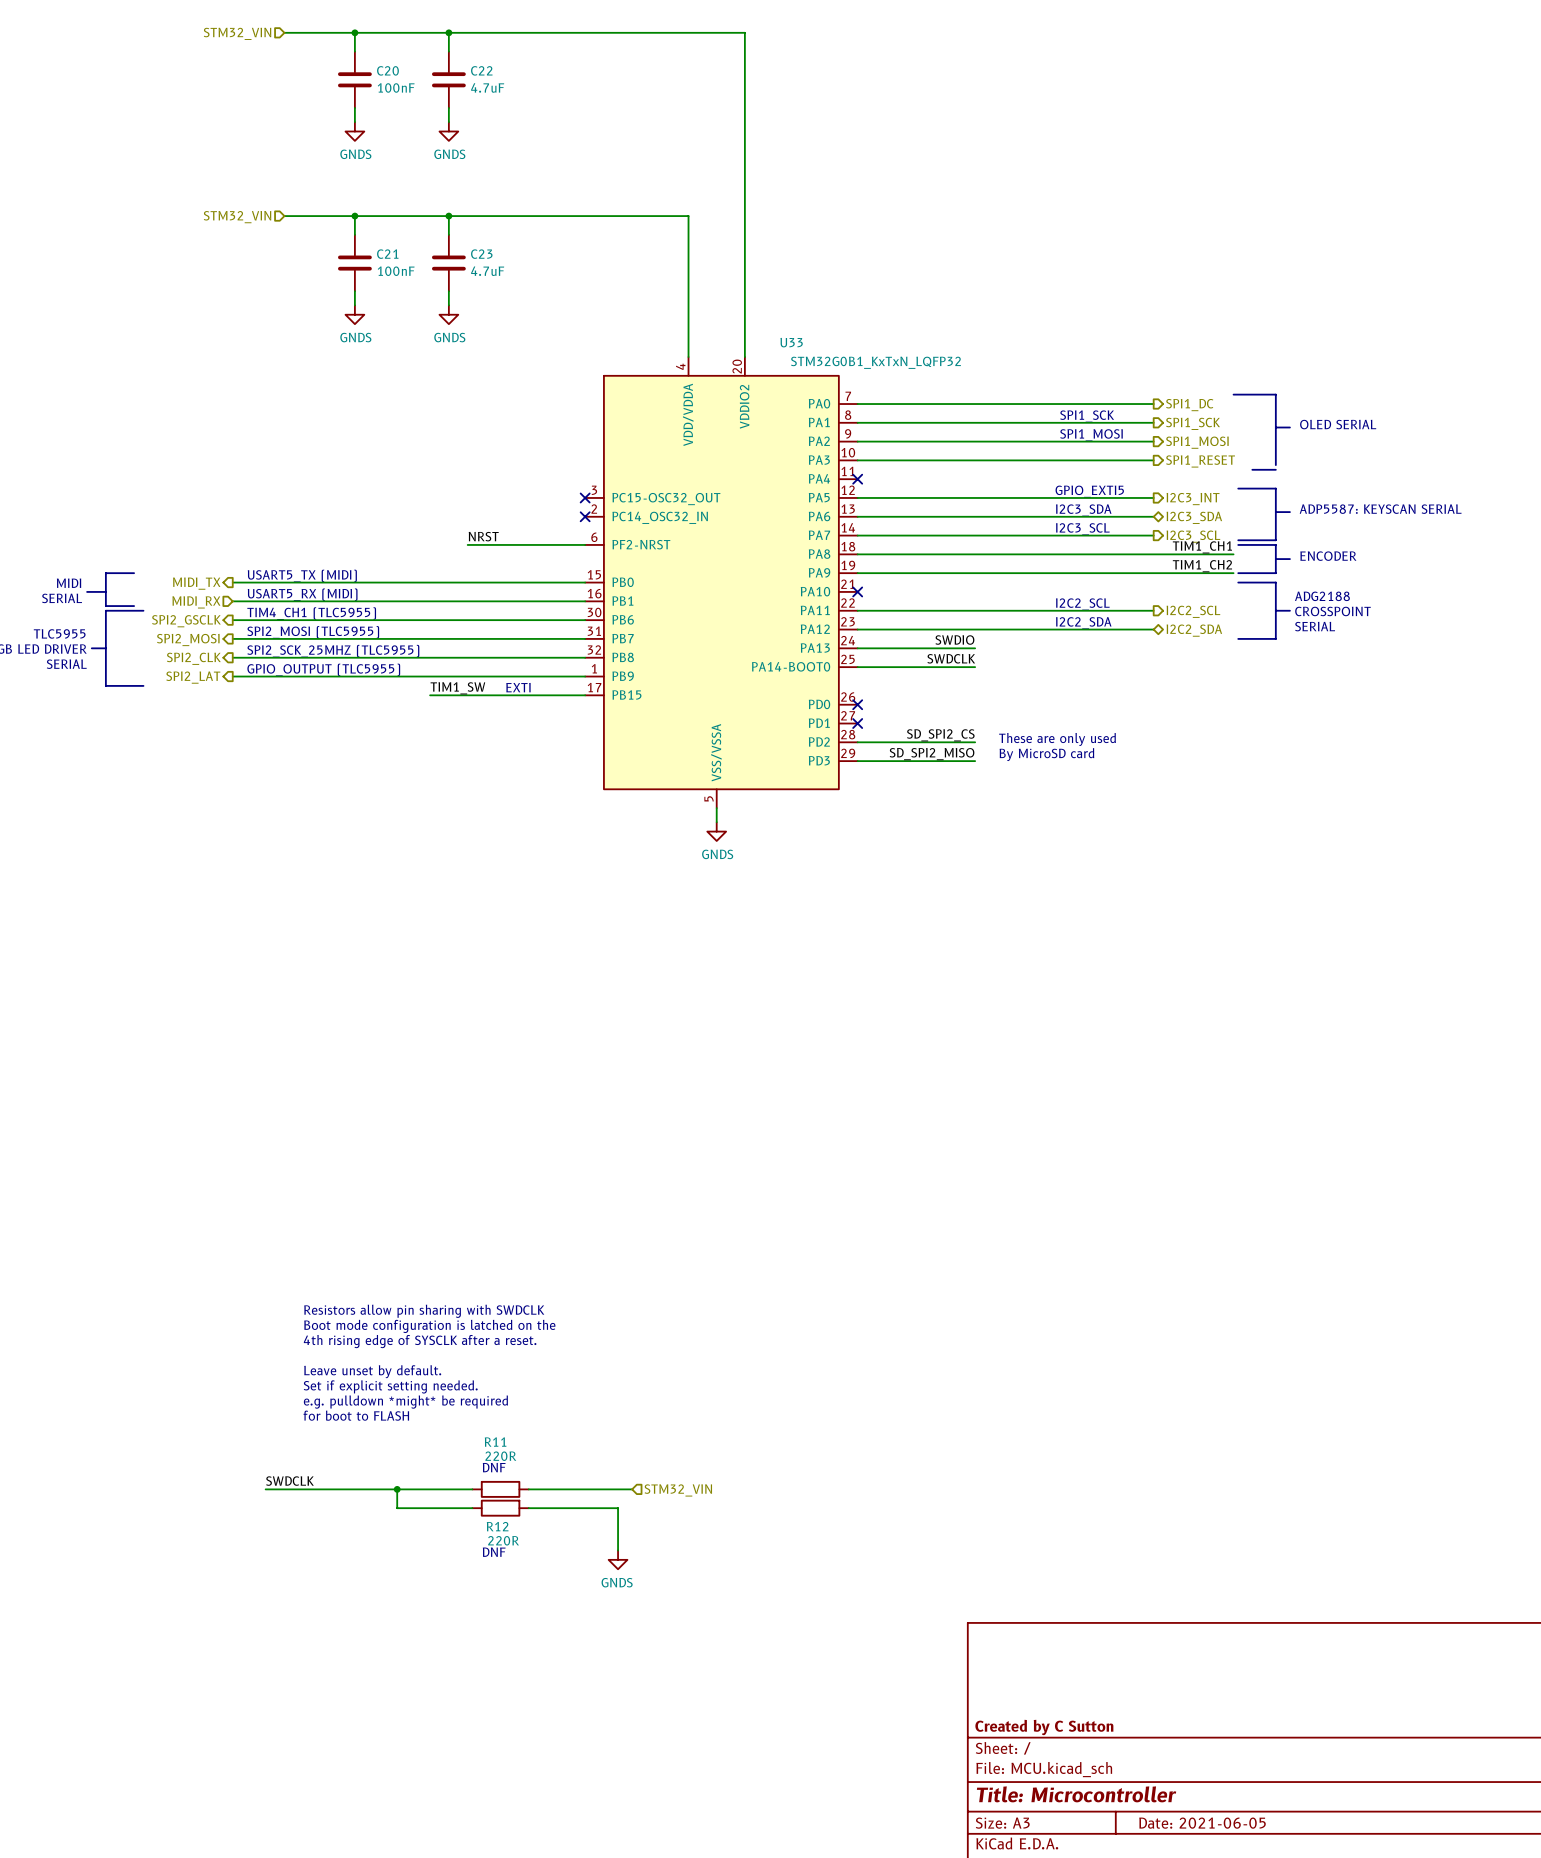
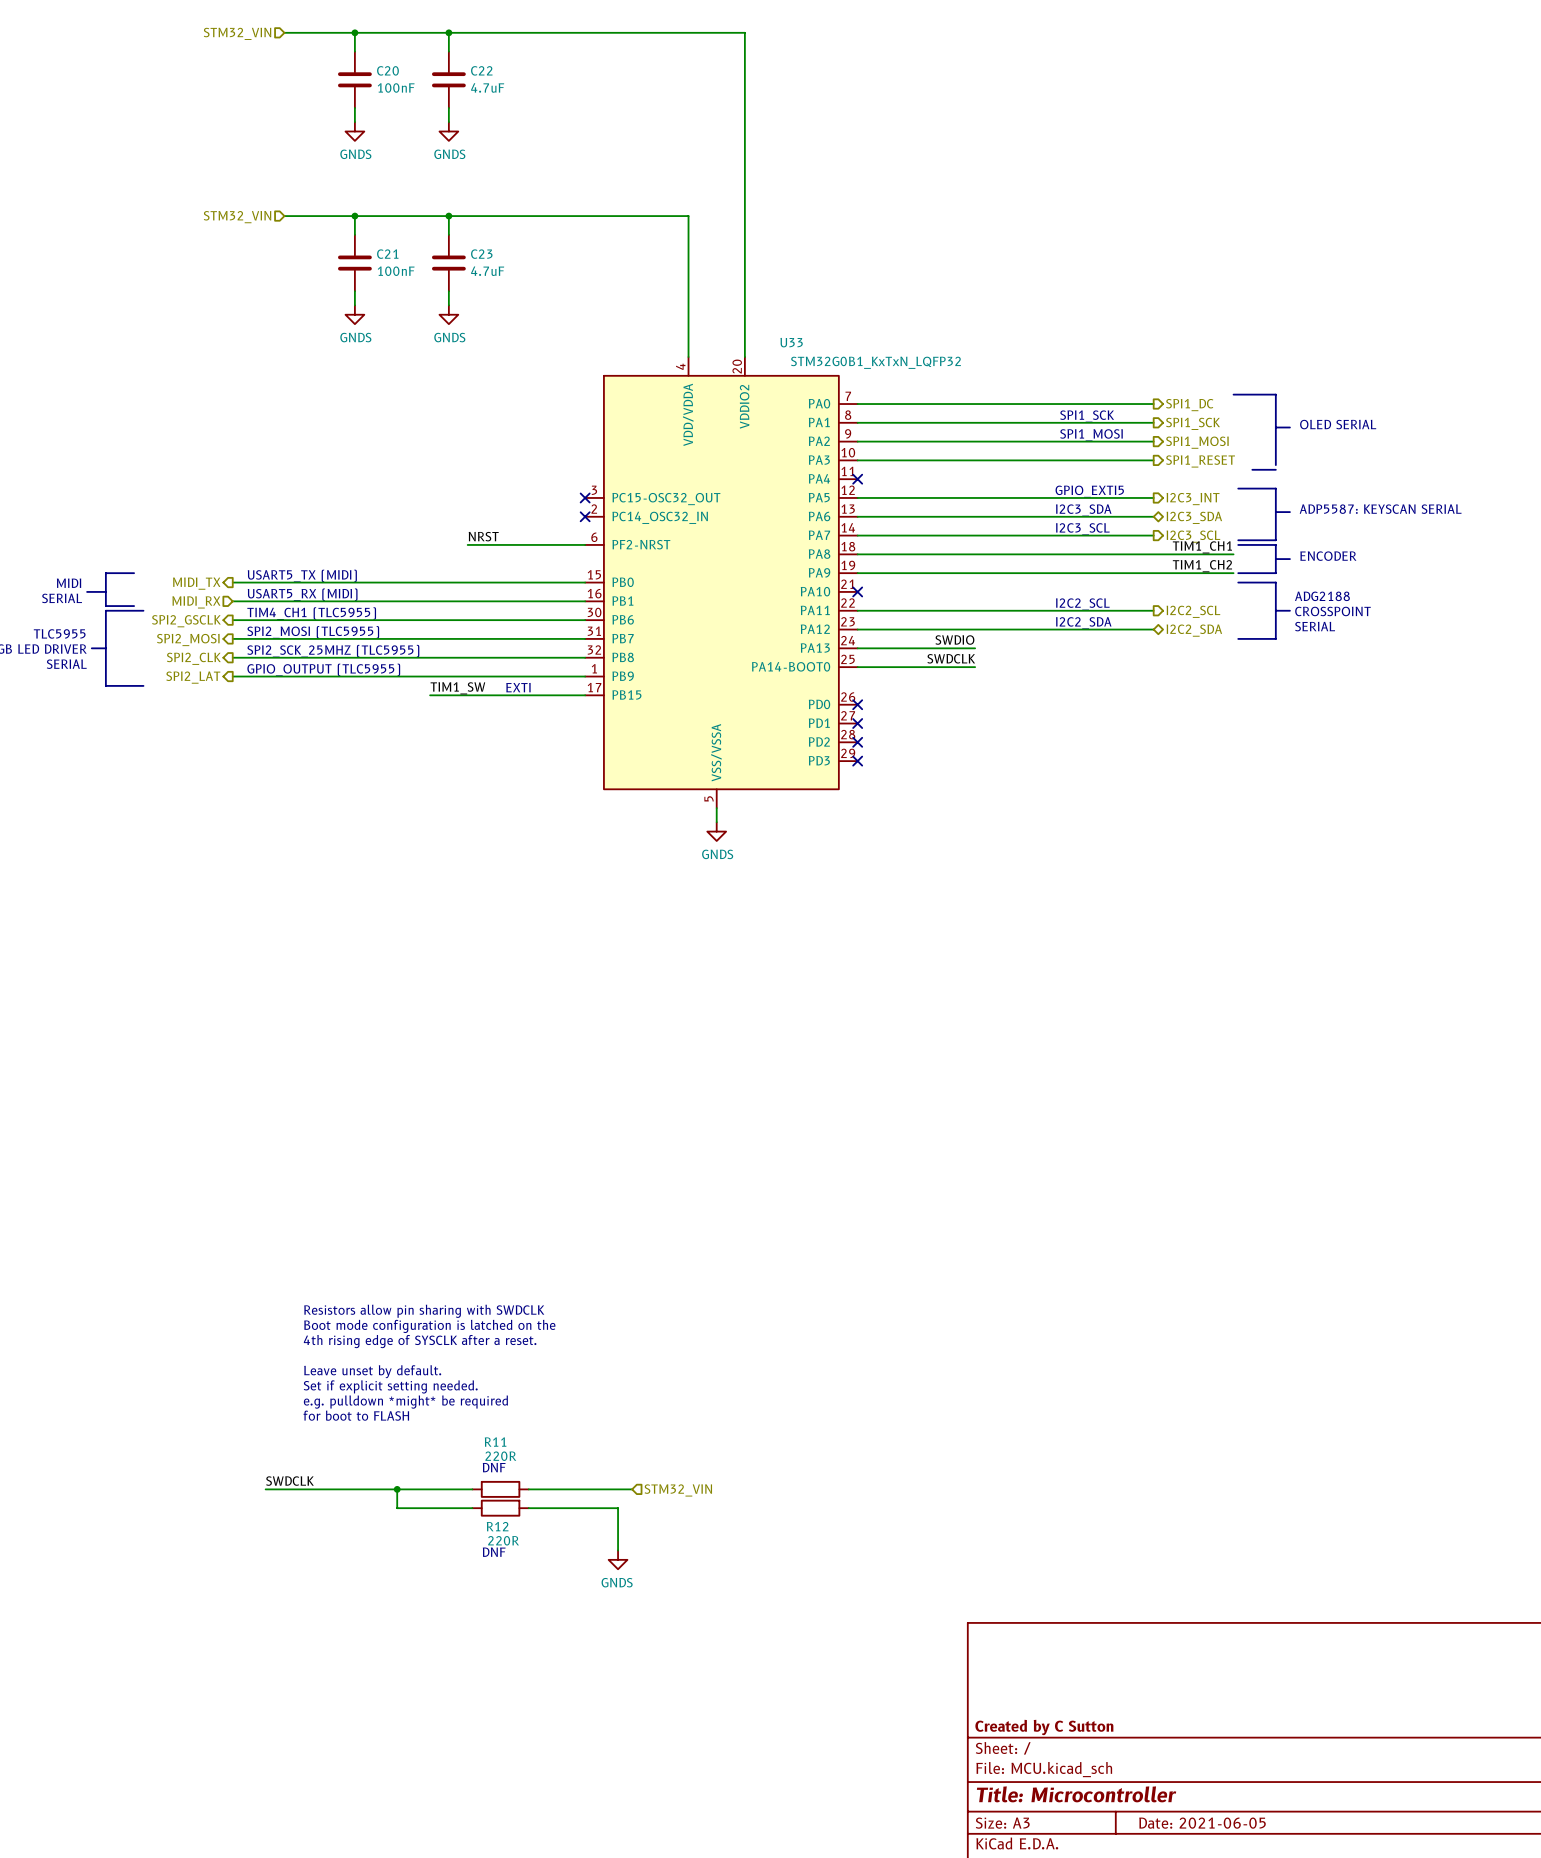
label: SD_SPI2_CS (940, 735) -> none
text: These are only used (1057, 739) -> none
wire: (857, 742) (975, 742) -> none
no-connect mark: none -> (857, 742)
label: SD_SPI2_MISO (932, 754) -> none
text: By MicroSD card (1046, 754) -> none
wire: (857, 761) (975, 761) -> none
no-connect mark: none -> (857, 761)

